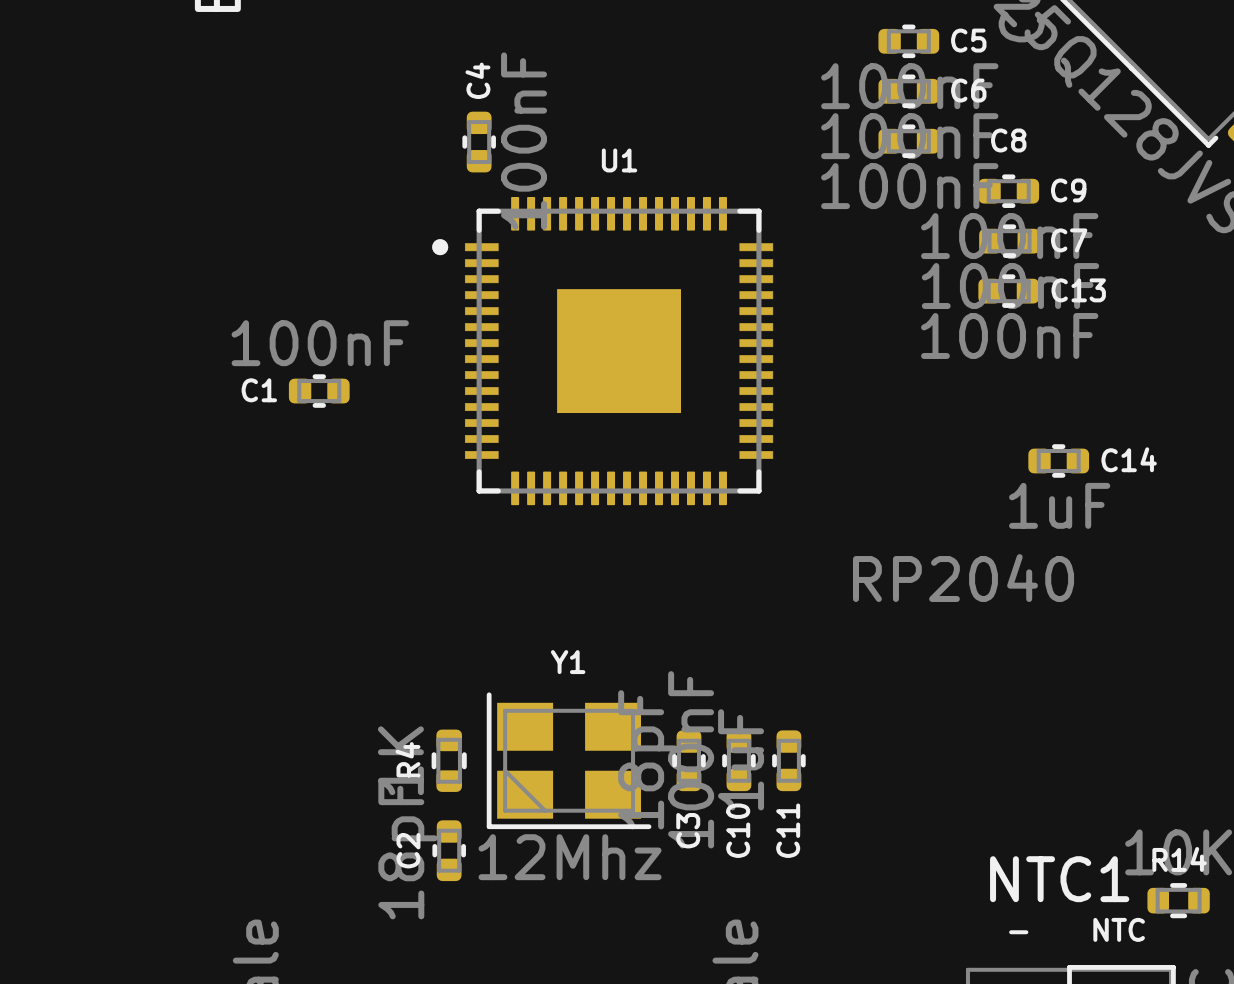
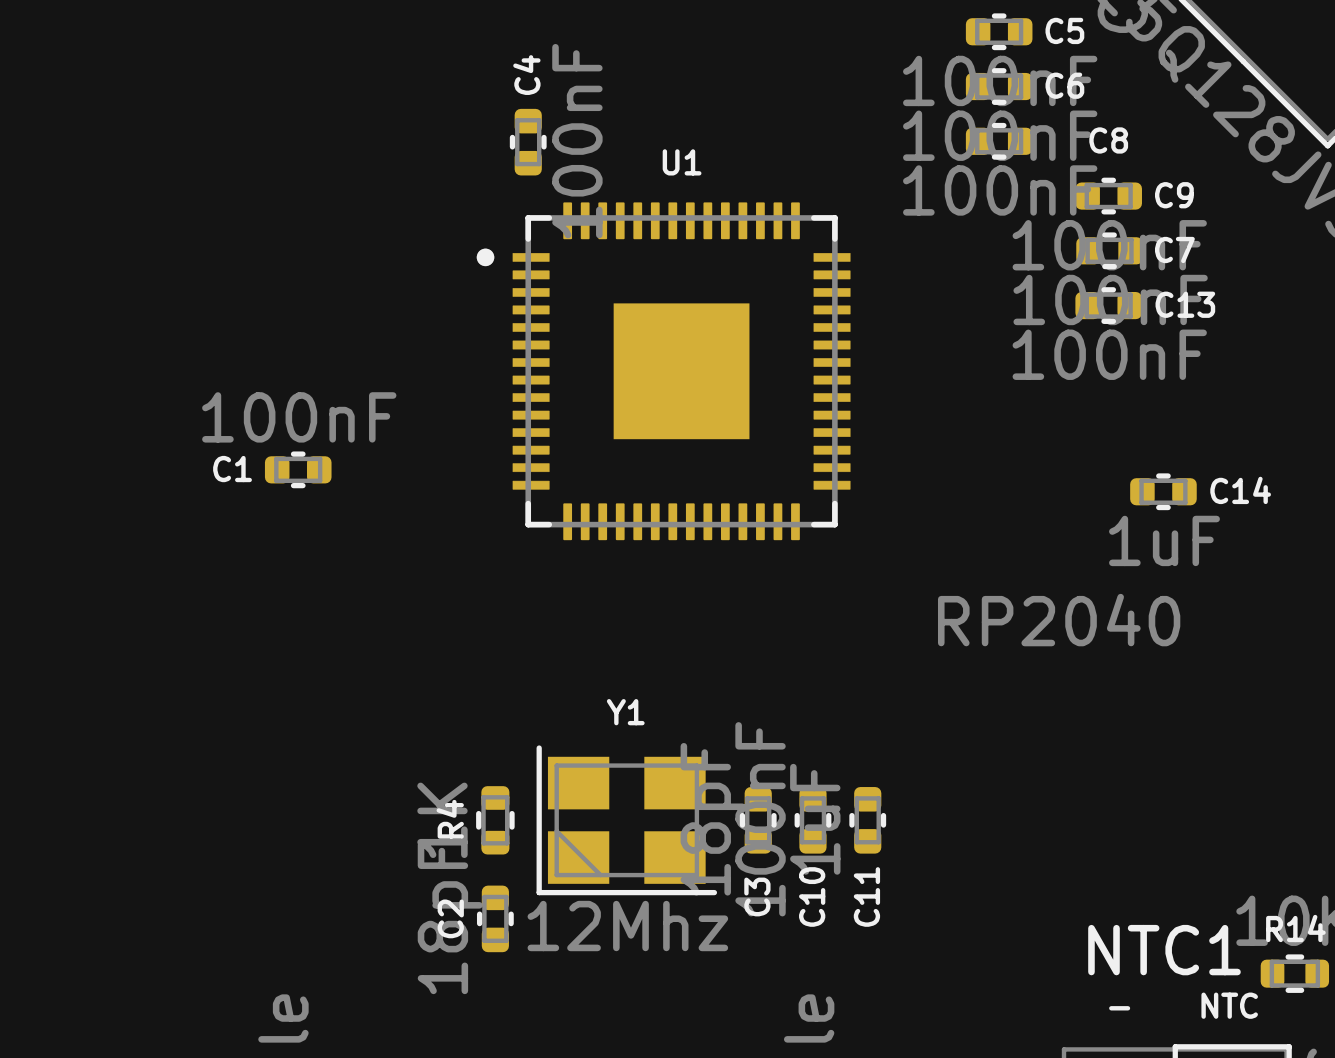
C1 position: (319, 391) -> (298, 469)

